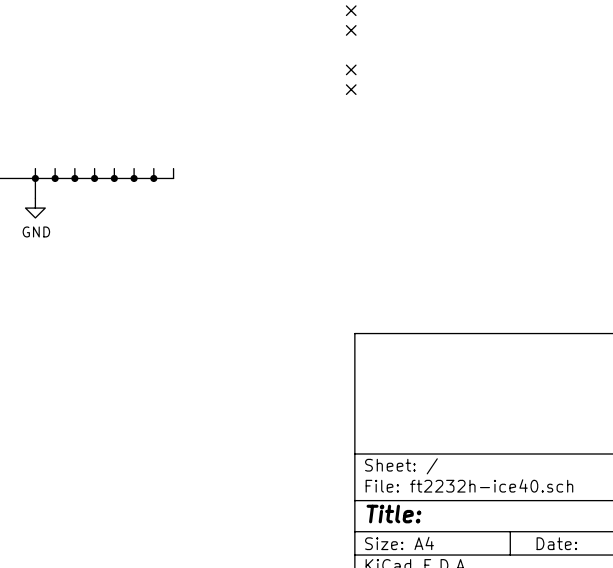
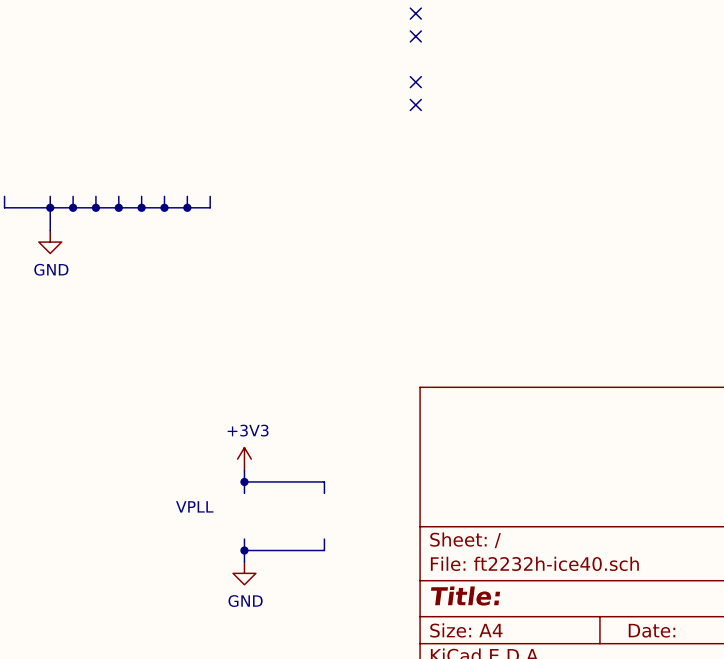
power symbol: none -> +3V3 (244, 459)
wire: none -> (244, 470) (244, 493)
wire: none -> (244, 481) (324, 481) (324, 493)
junction: none -> (244, 481)
text: none -> VPLL (194, 506)
wire: none -> (244, 539) (244, 561)
wire: none -> (324, 539) (324, 550) (244, 550)
junction: none -> (244, 550)
power symbol: none -> GND (244, 573)

